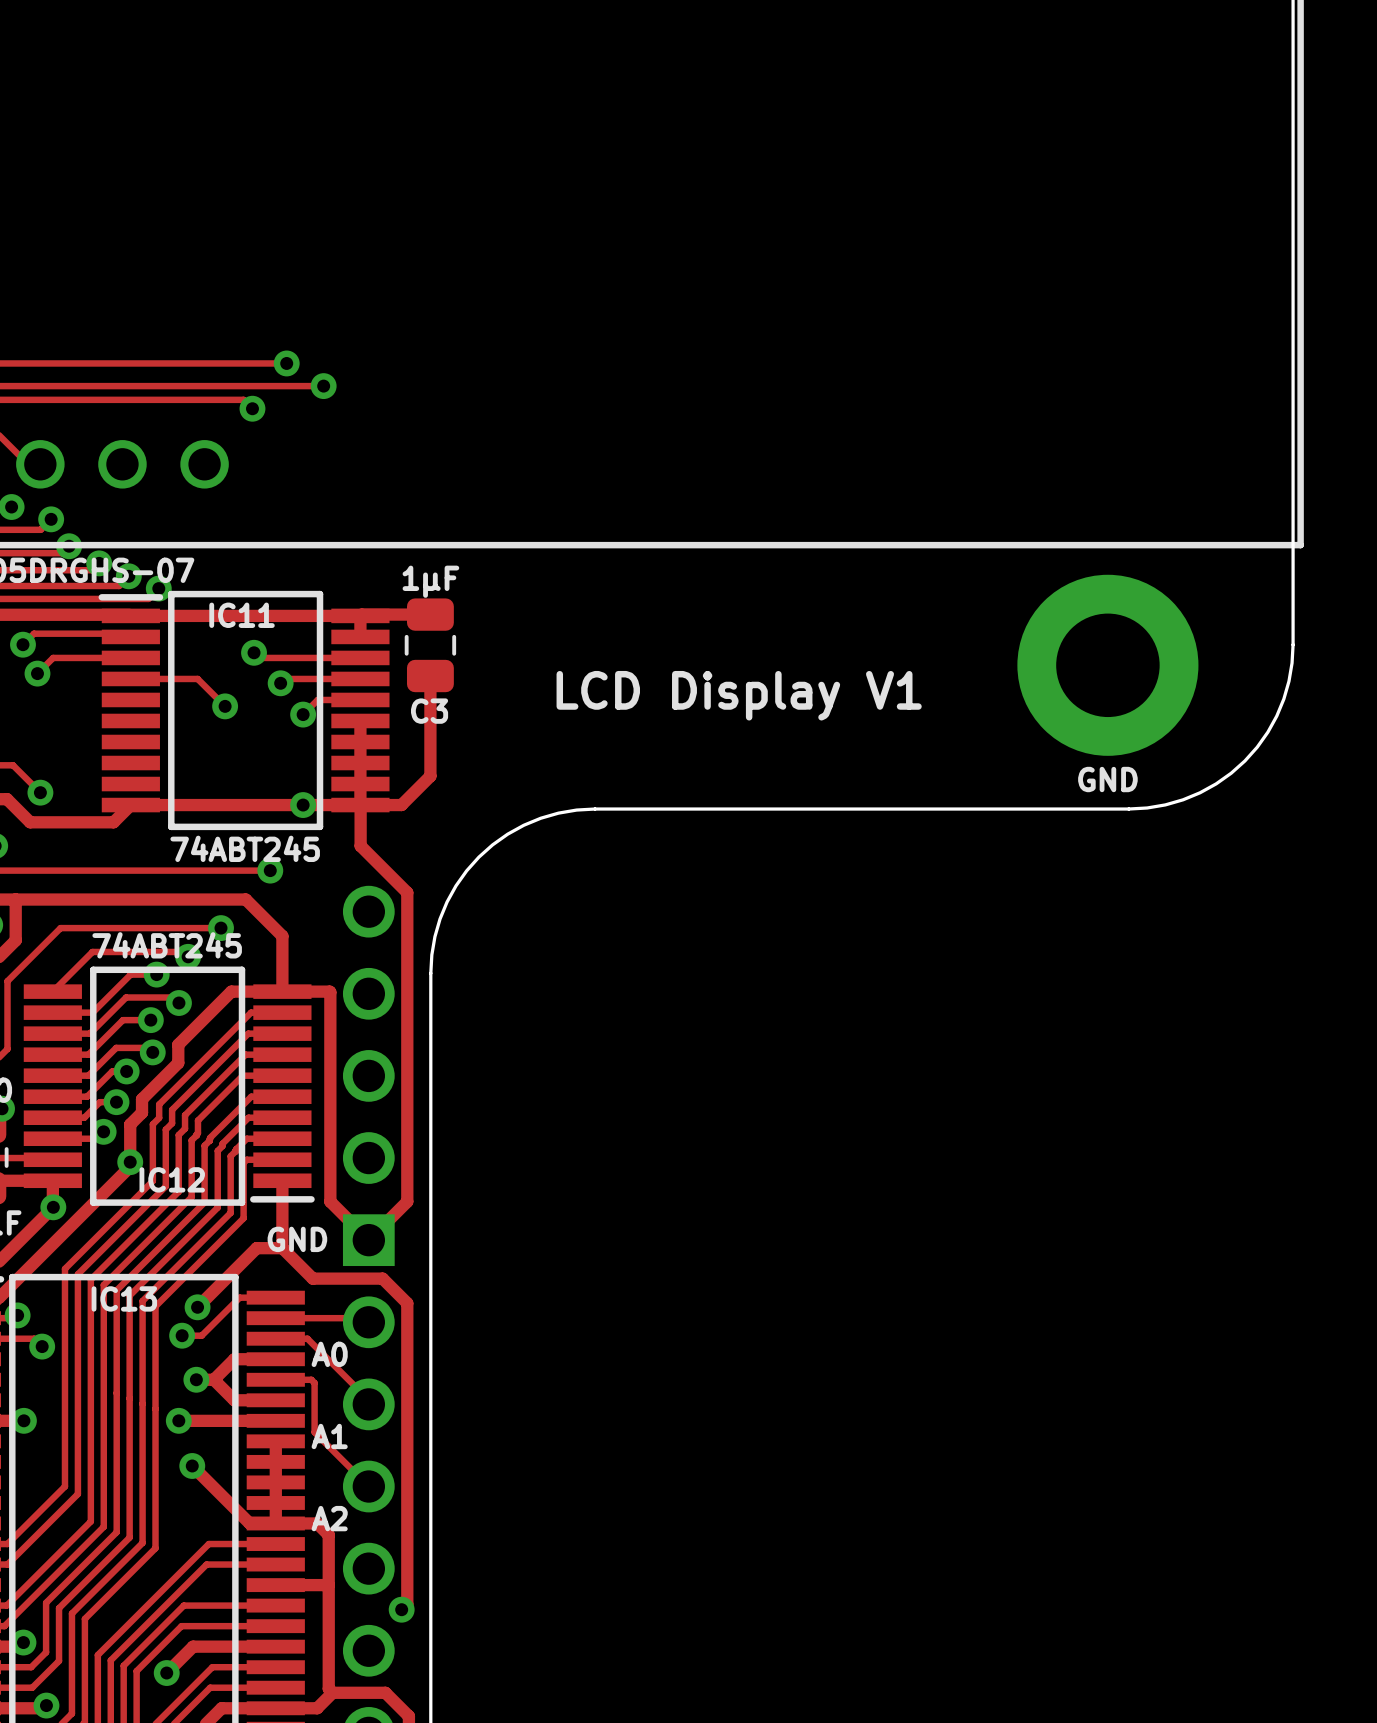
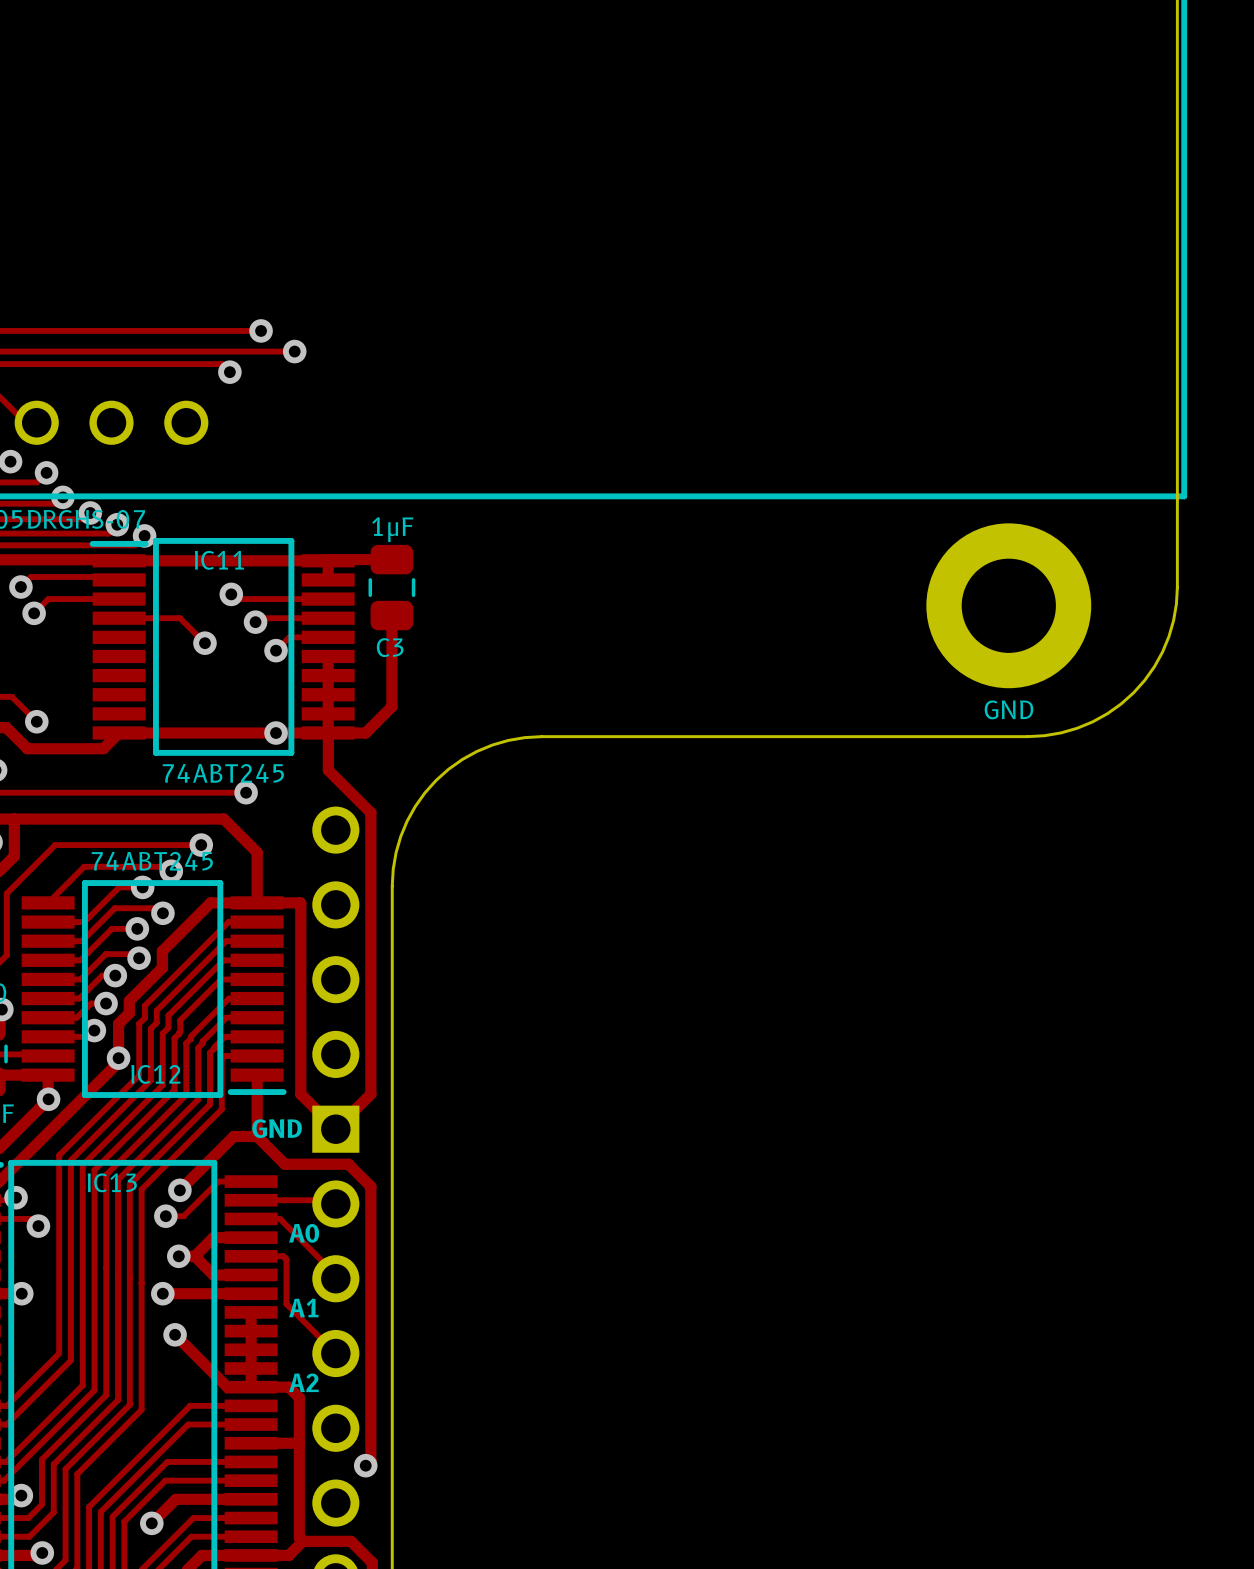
text: LCD Display V1 (739, 695) -> none

